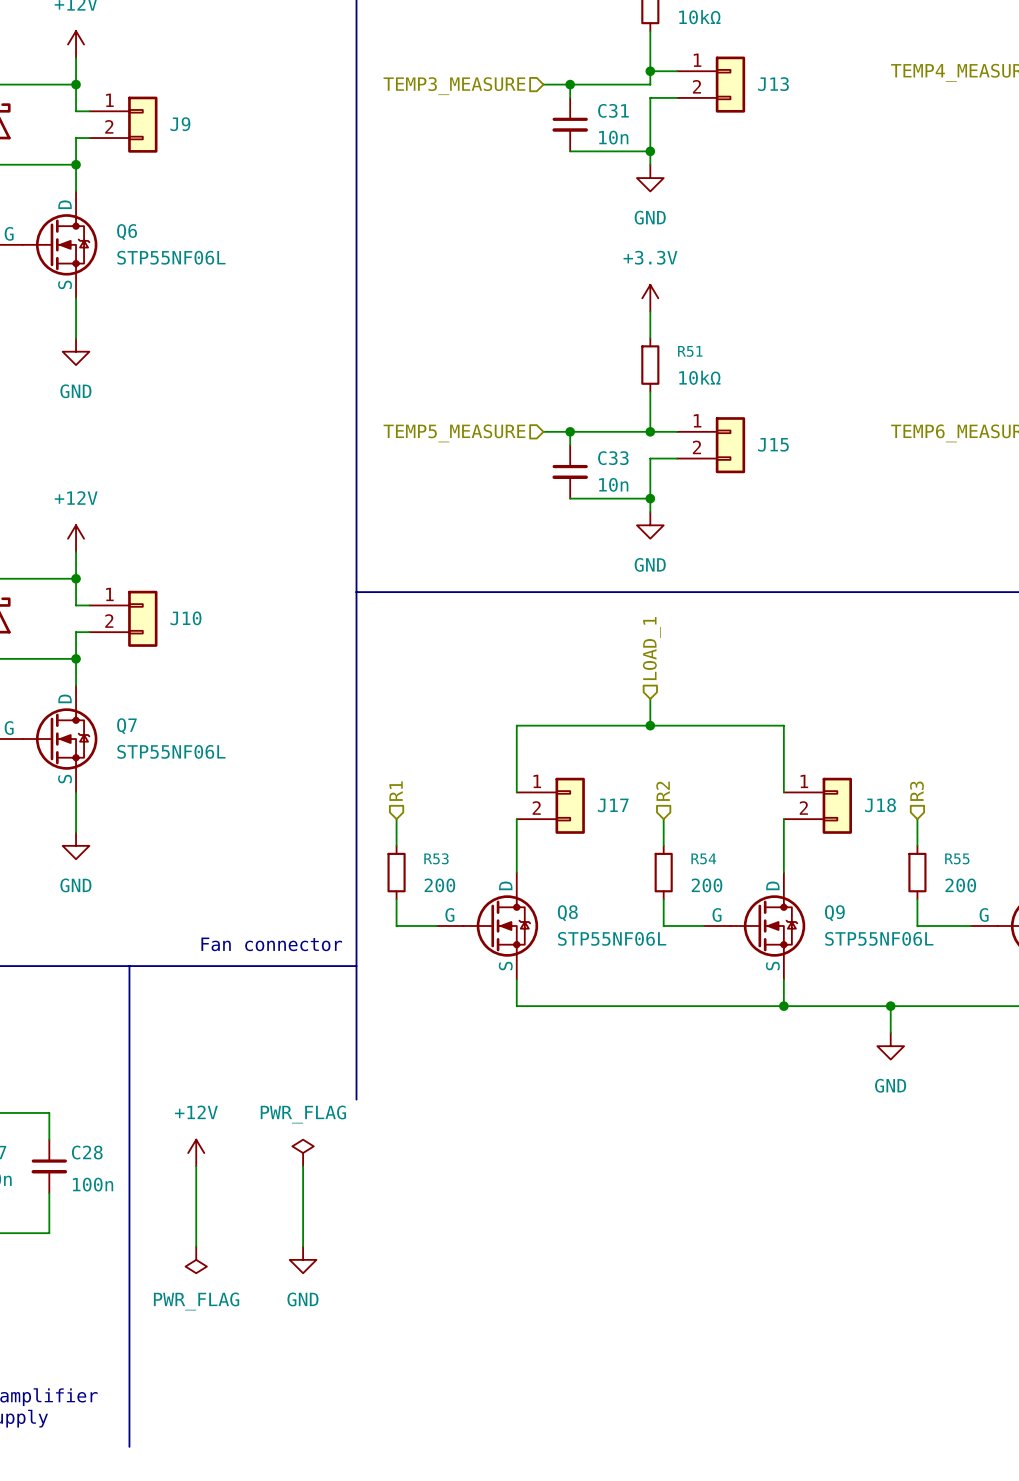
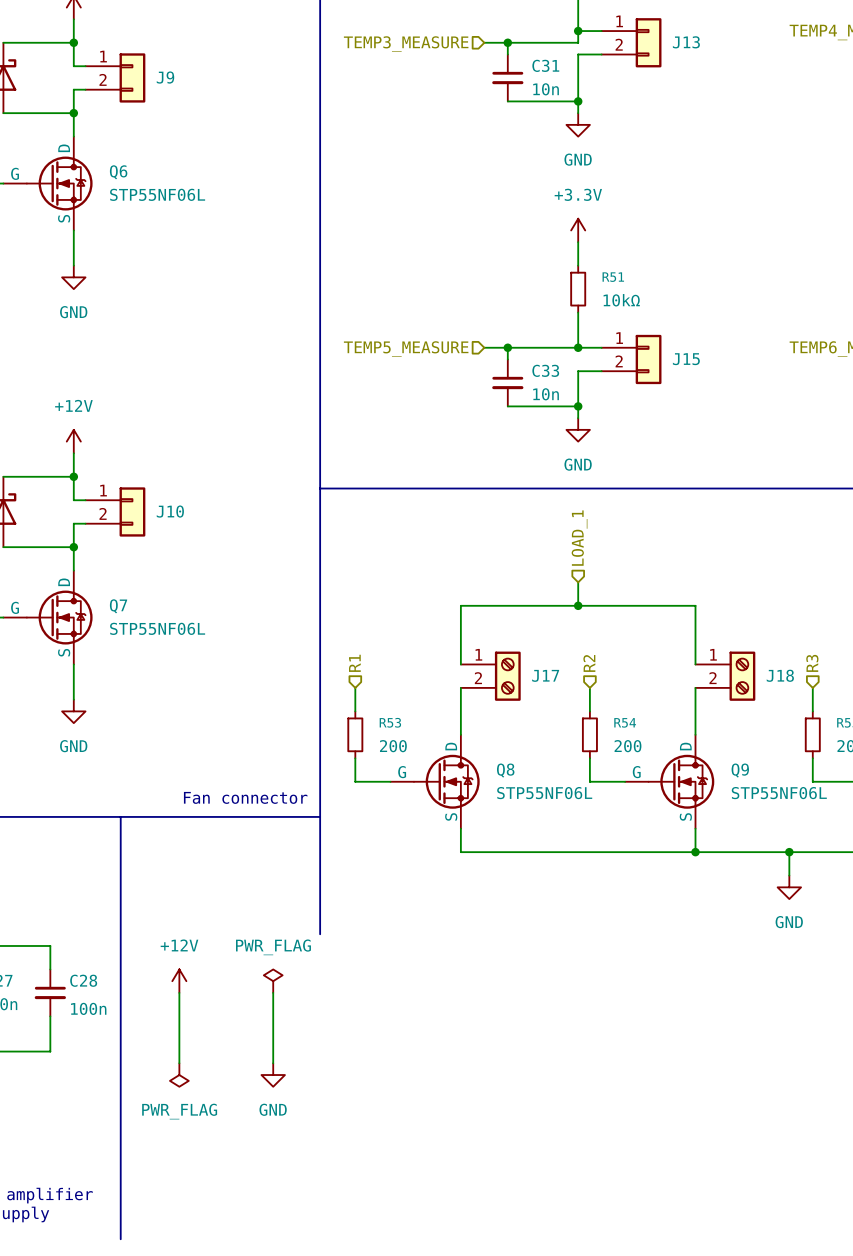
J17 symbol: [516, 777, 585, 834] -> [460, 651, 521, 701]
J18 symbol: [783, 777, 852, 834] -> [695, 651, 756, 701]

